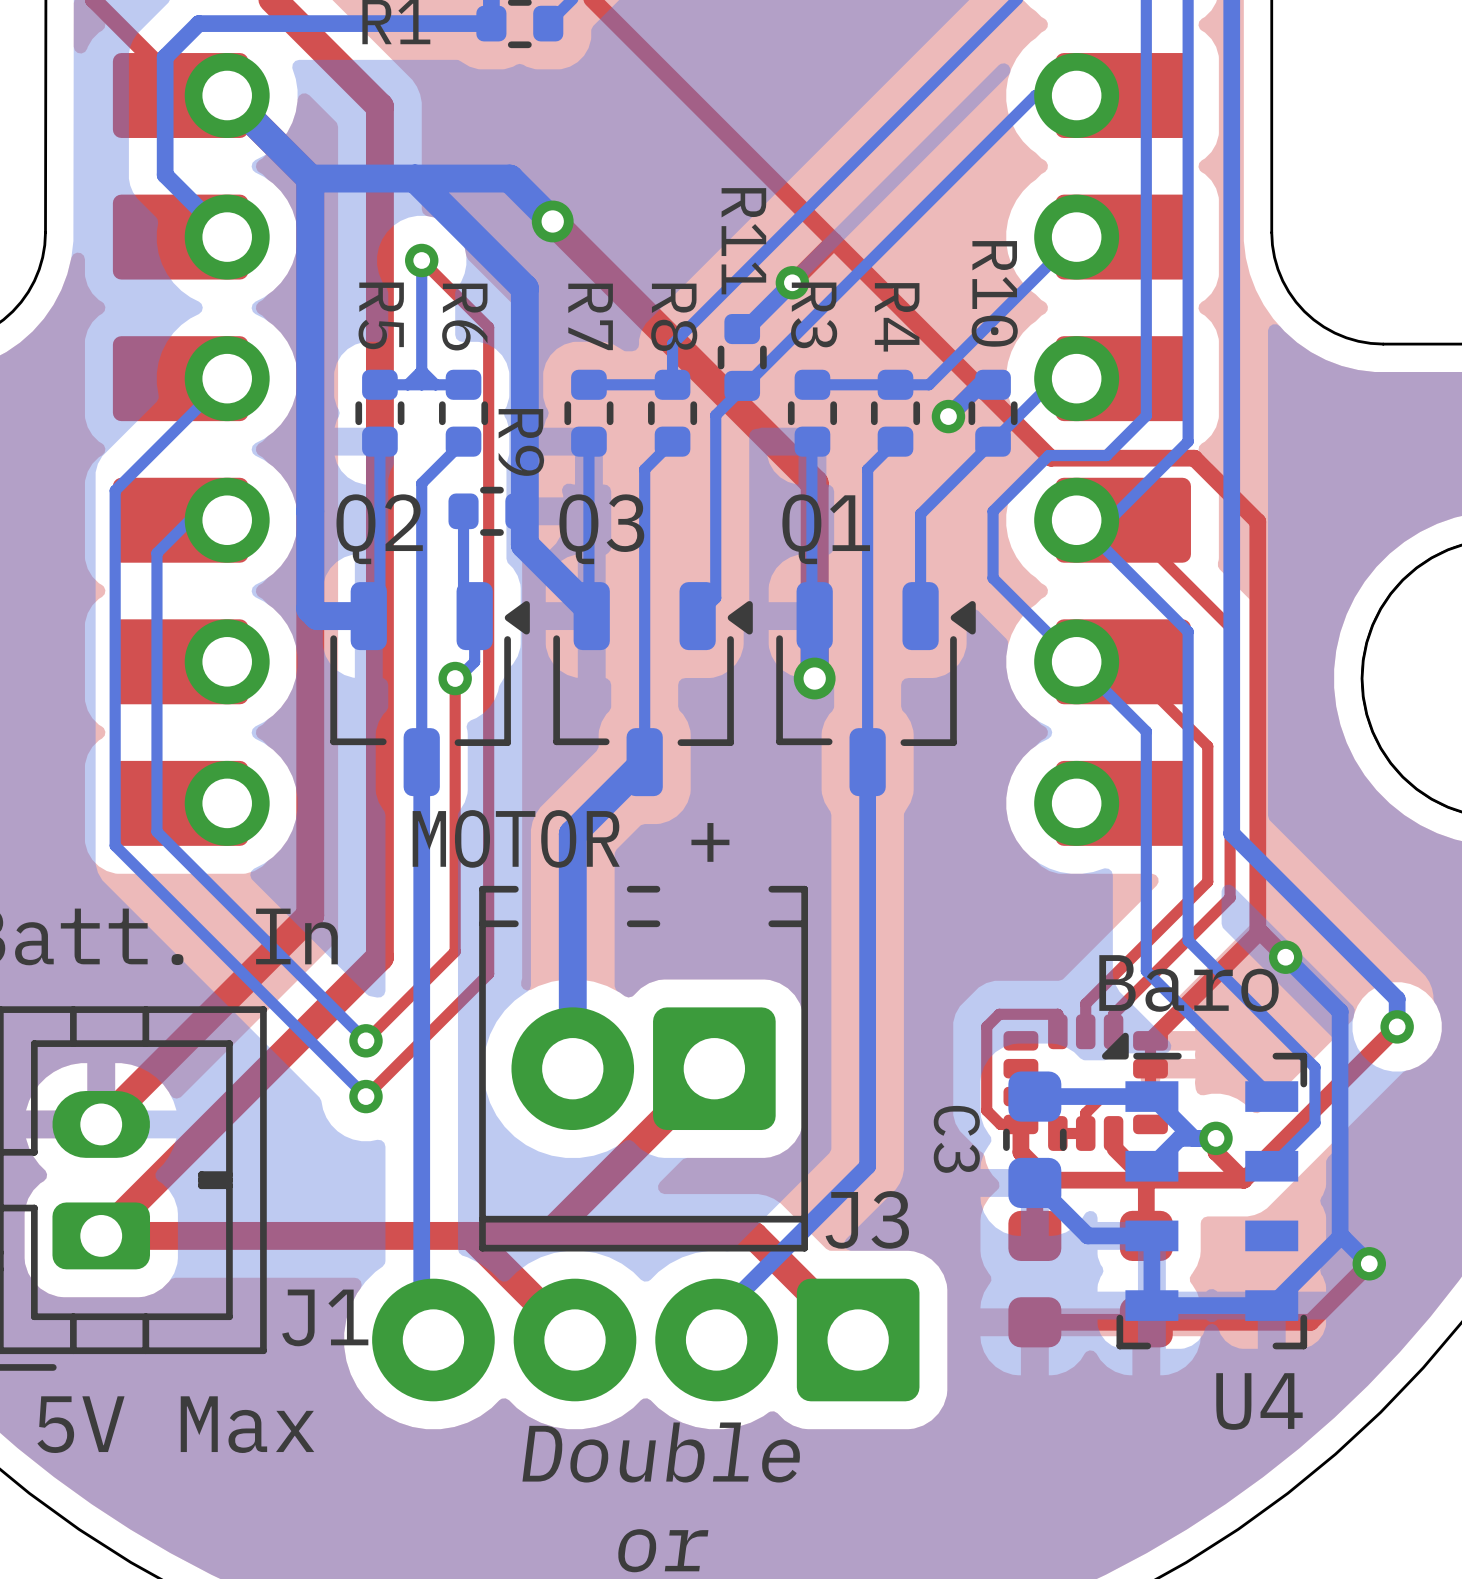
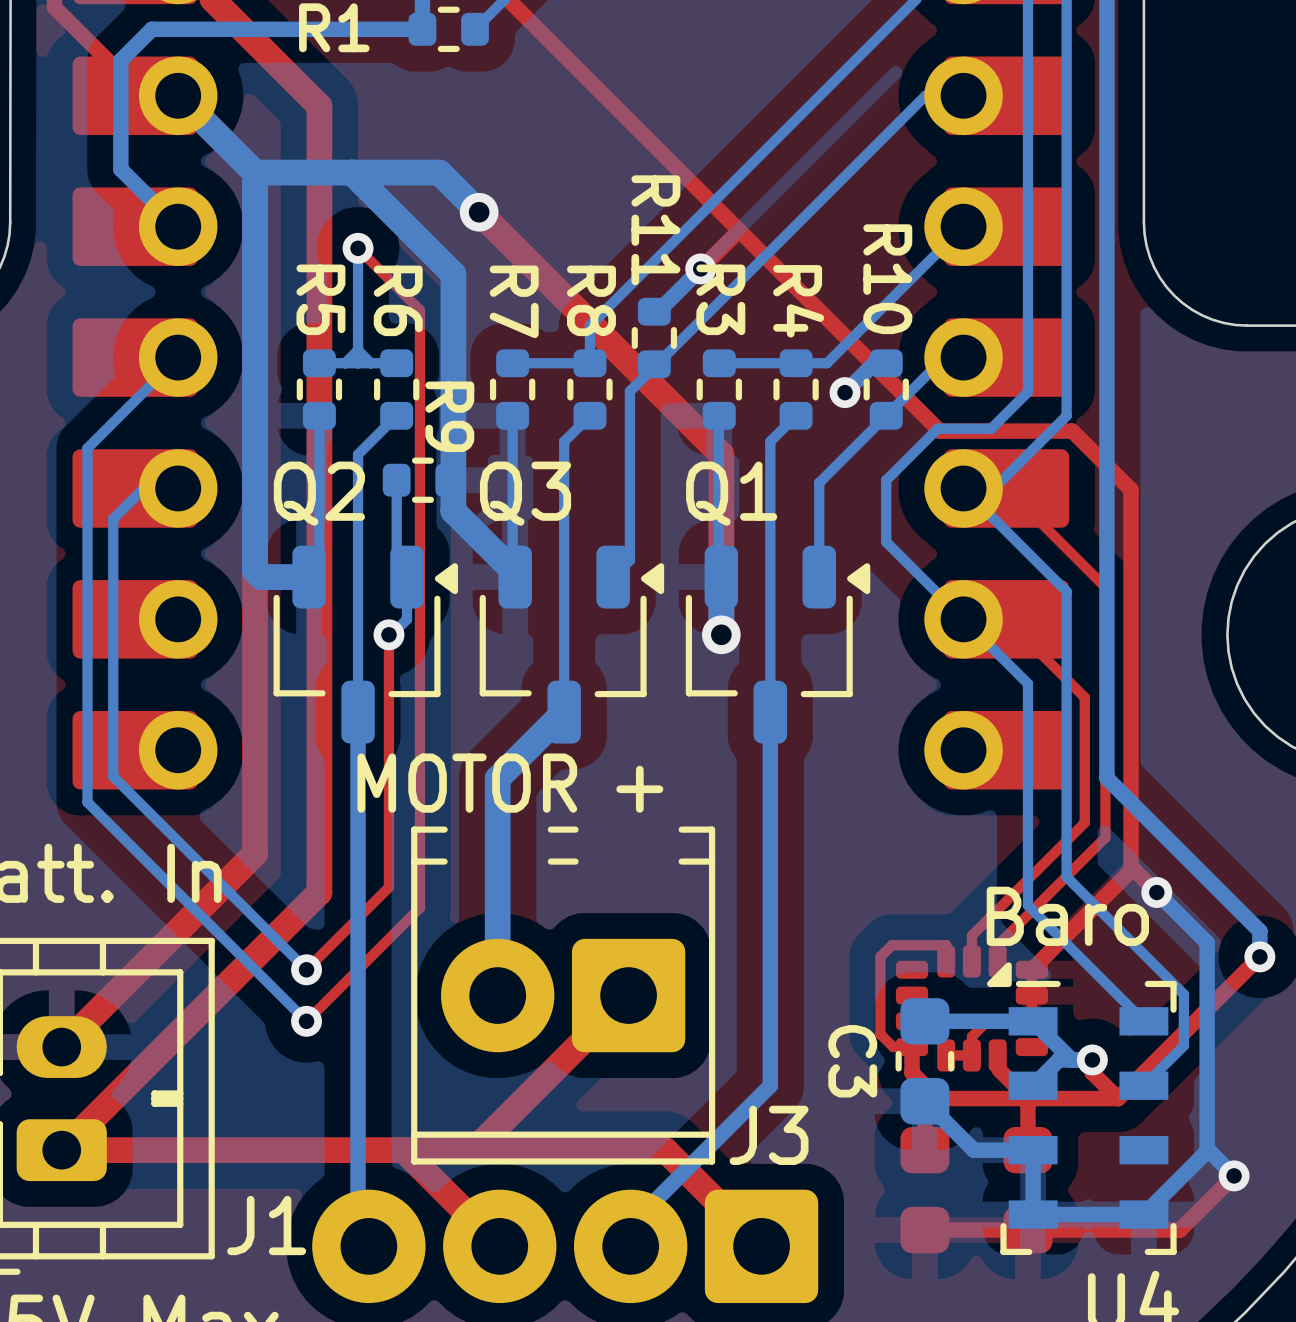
bottom track: (129, 476) (115, 490) (115, 845) (129, 859) -> (87, 448) (87, 802)

